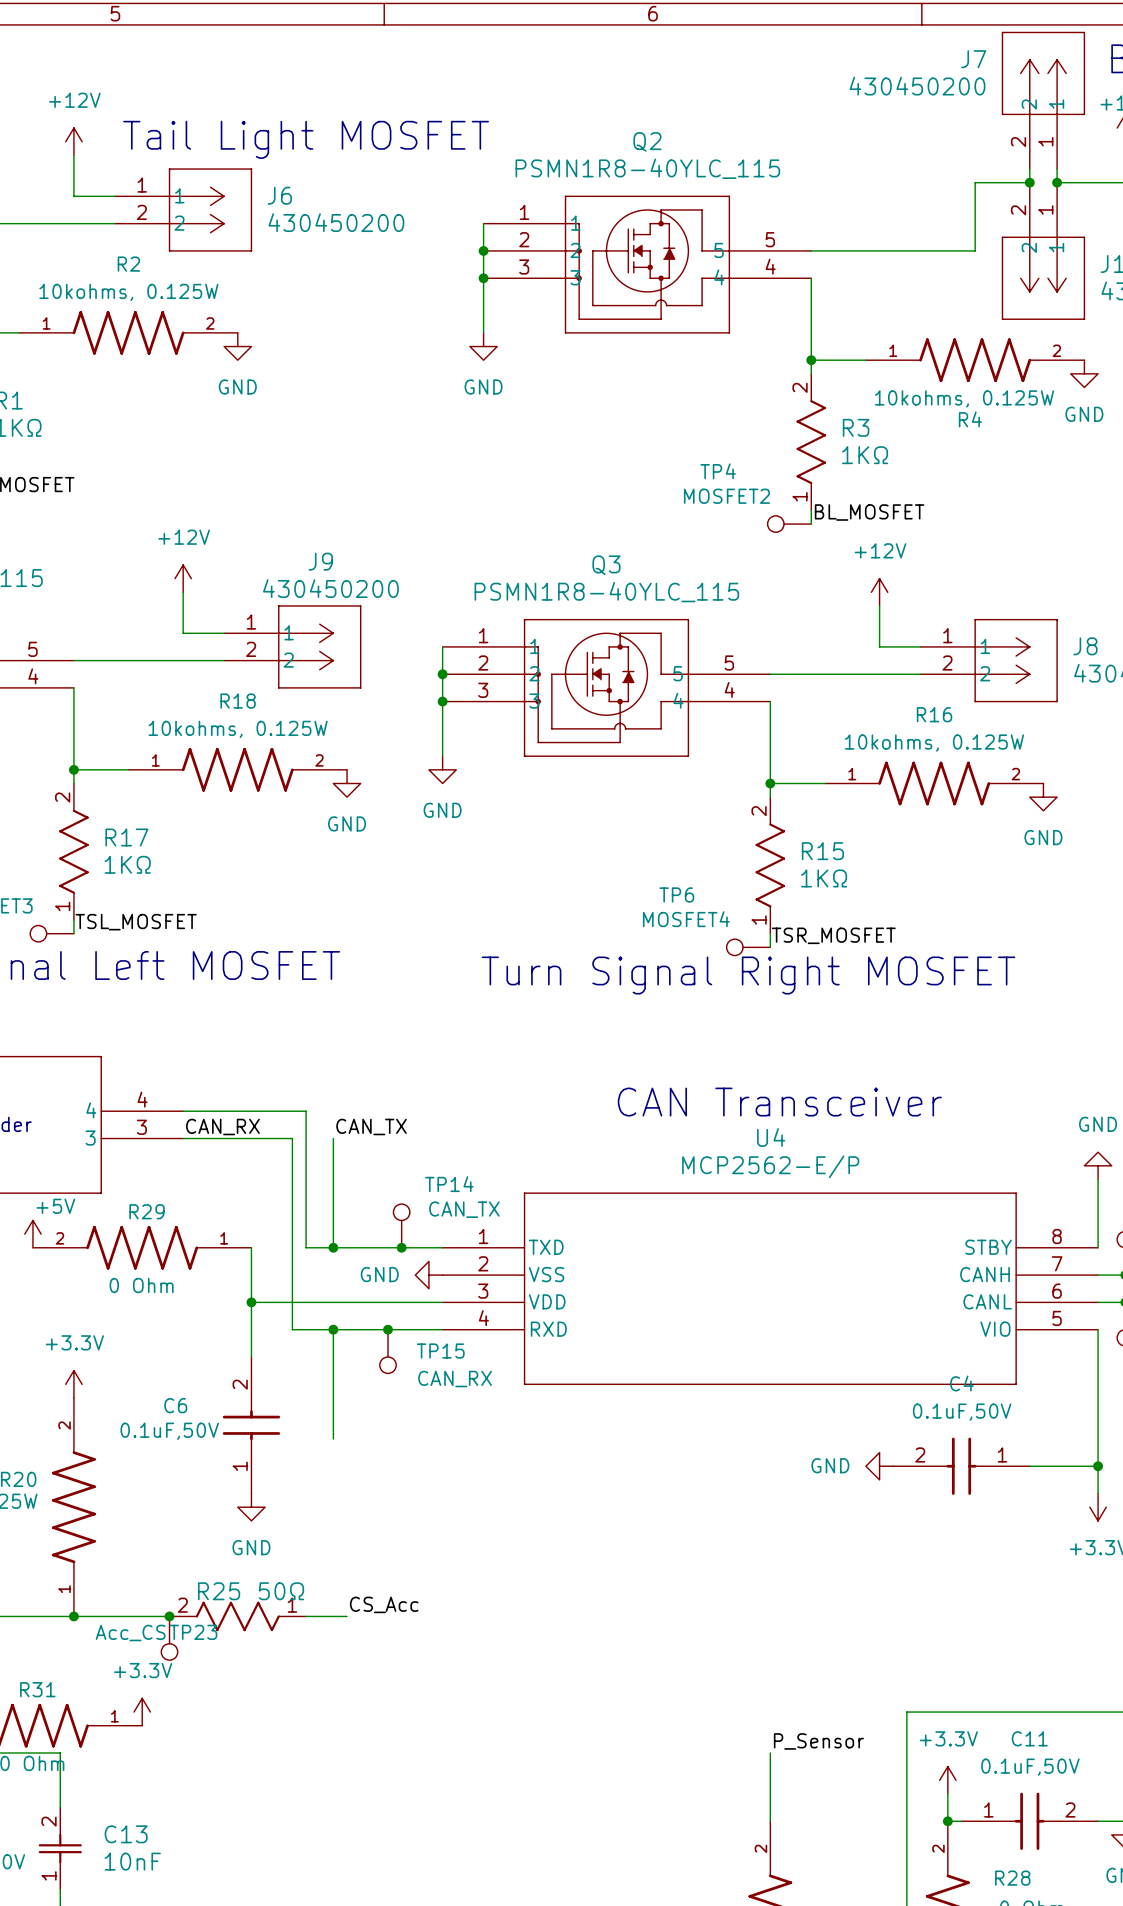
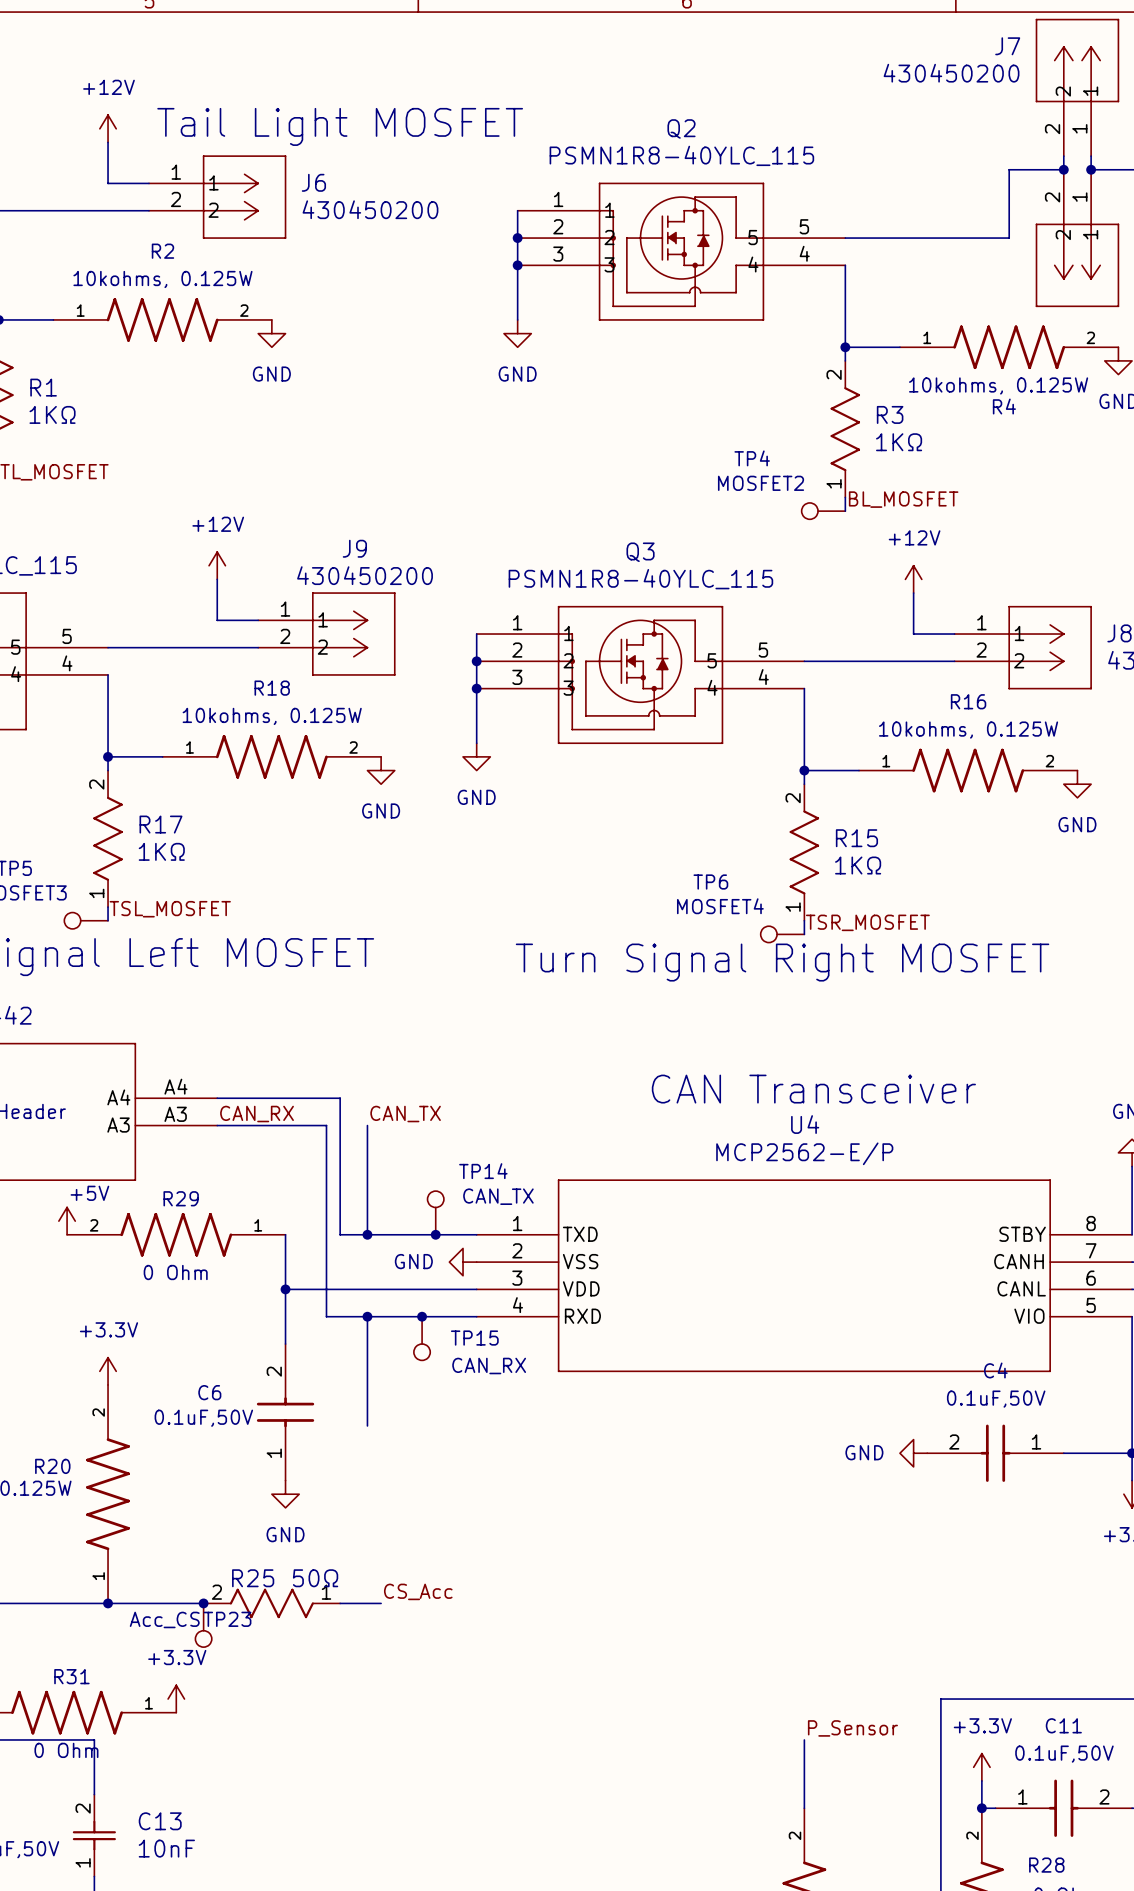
part pin number: 4 (142, 1099) -> A4 (175, 1086)
part pin name: 4 (91, 1110) -> A4 (118, 1097)
part pin number: 3 (141, 1127) -> A3 (175, 1114)
part pin name: 3 (90, 1138) -> A3 (118, 1125)

